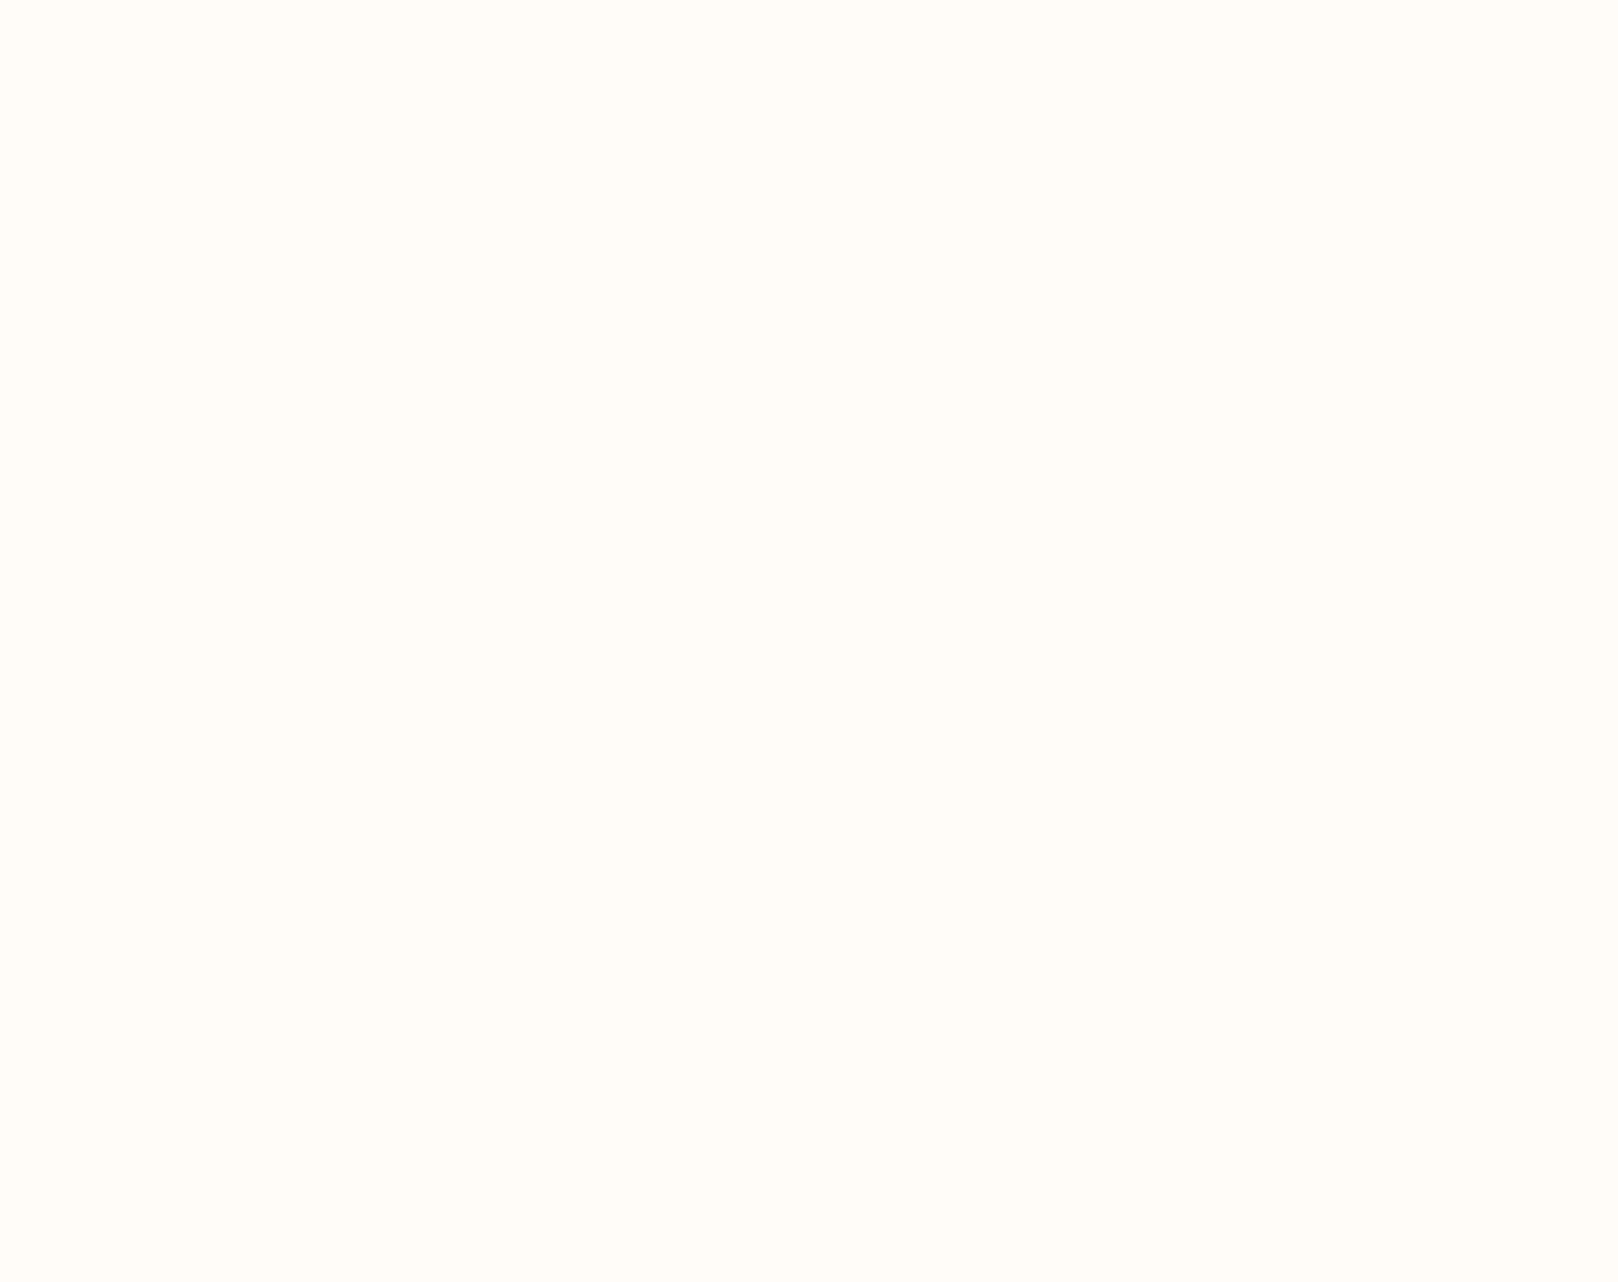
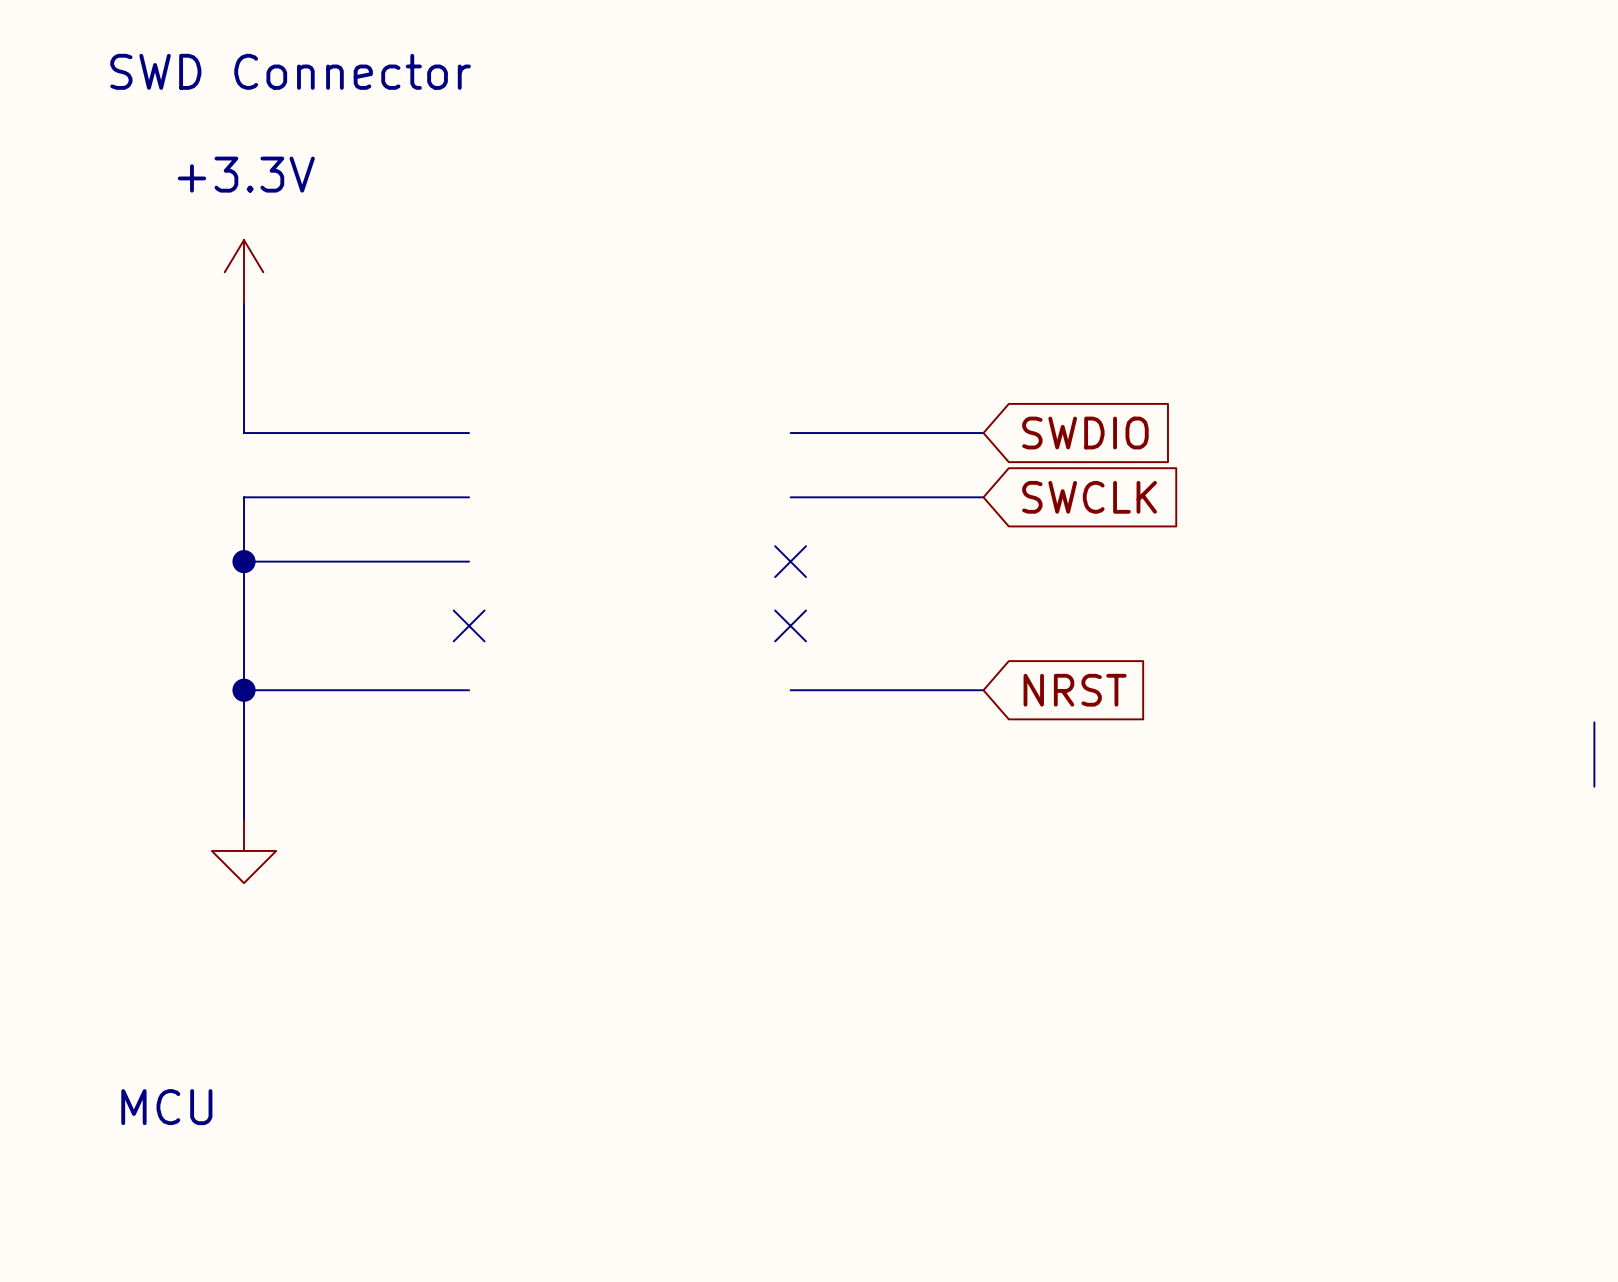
text: none -> SWD Connector (290, 71)
power symbol: none -> +3.3V (244, 272)
wire: none -> (244, 304) (244, 433) (469, 433)
wire: none -> (790, 433) (983, 433)
global label: none -> SWDIO (1085, 433)
wire: none -> (469, 497) (244, 497) (244, 818)
wire: none -> (790, 497) (983, 497)
global label: none -> SWCLK (1089, 497)
wire: none -> (244, 561) (469, 561)
junction: none -> (244, 561)
no-connect mark: none -> (790, 561)
no-connect mark: none -> (469, 625)
no-connect mark: none -> (790, 625)
wire: none -> (244, 690) (469, 690)
junction: none -> (244, 690)
wire: none -> (790, 690) (983, 690)
global label: none -> NRST (1075, 690)
wire: none -> (1594, 722) (1594, 786)
power symbol: none -> (244, 850)
text: none -> MCU (166, 1107)

